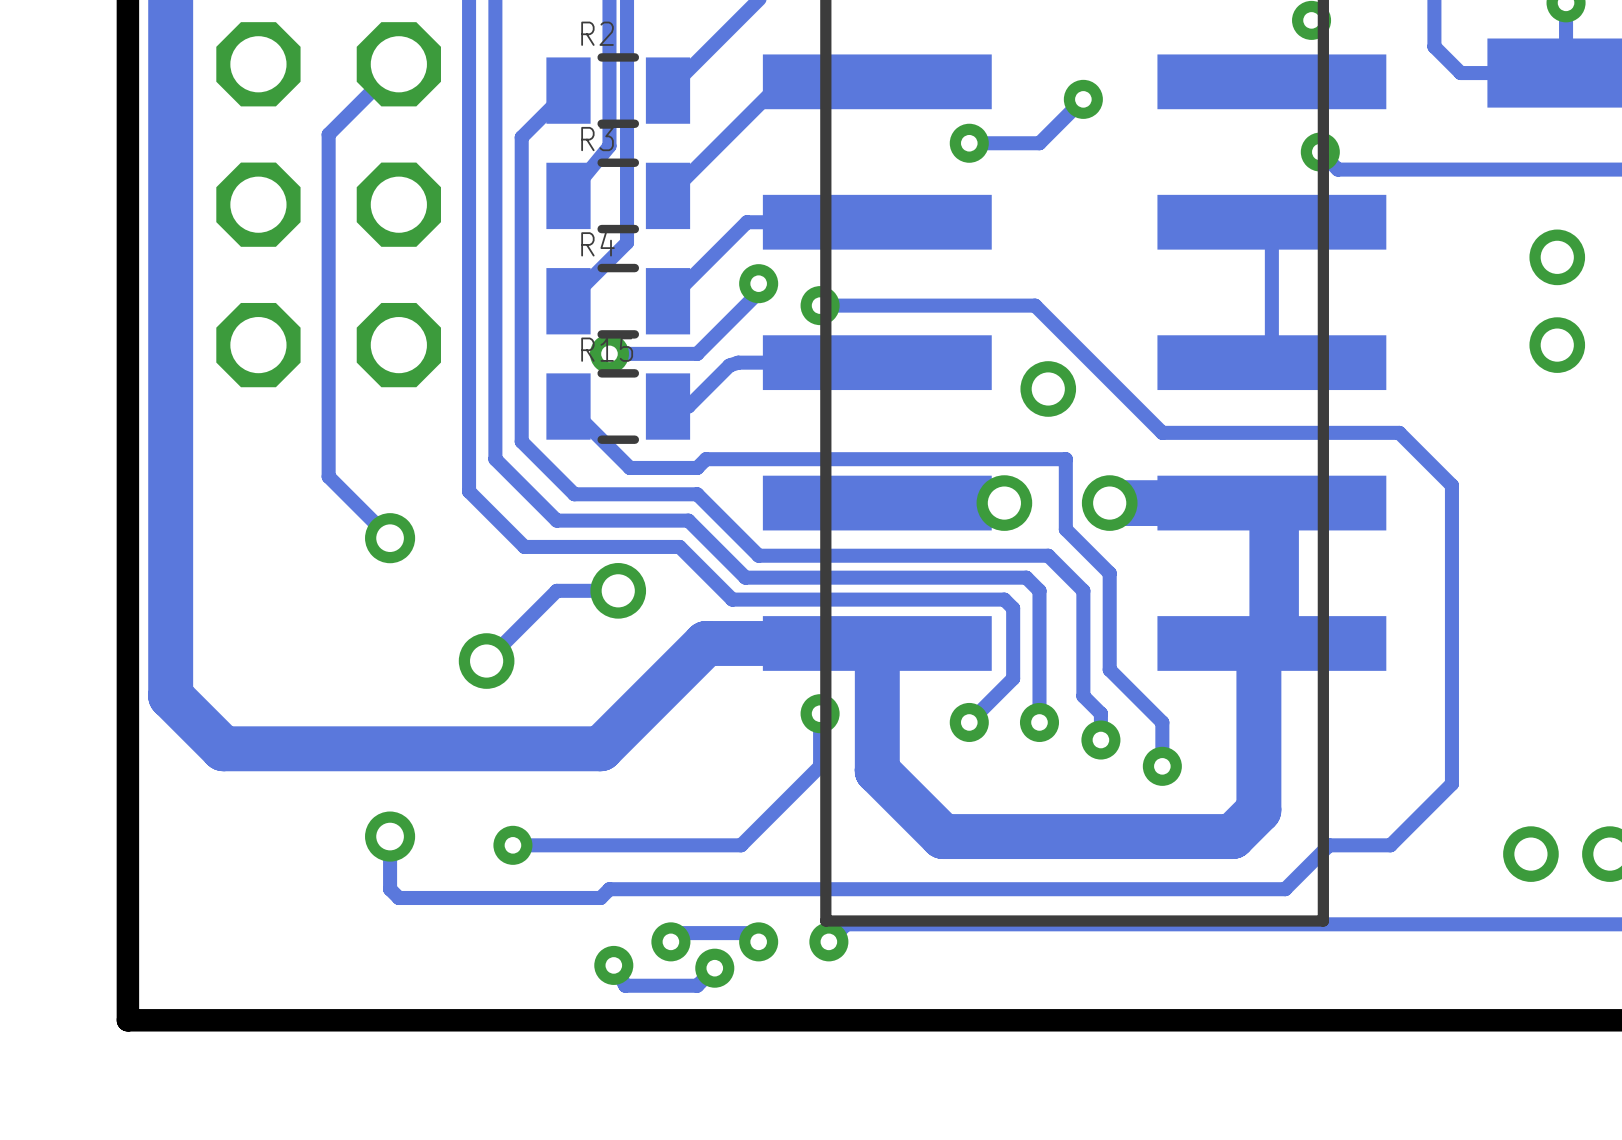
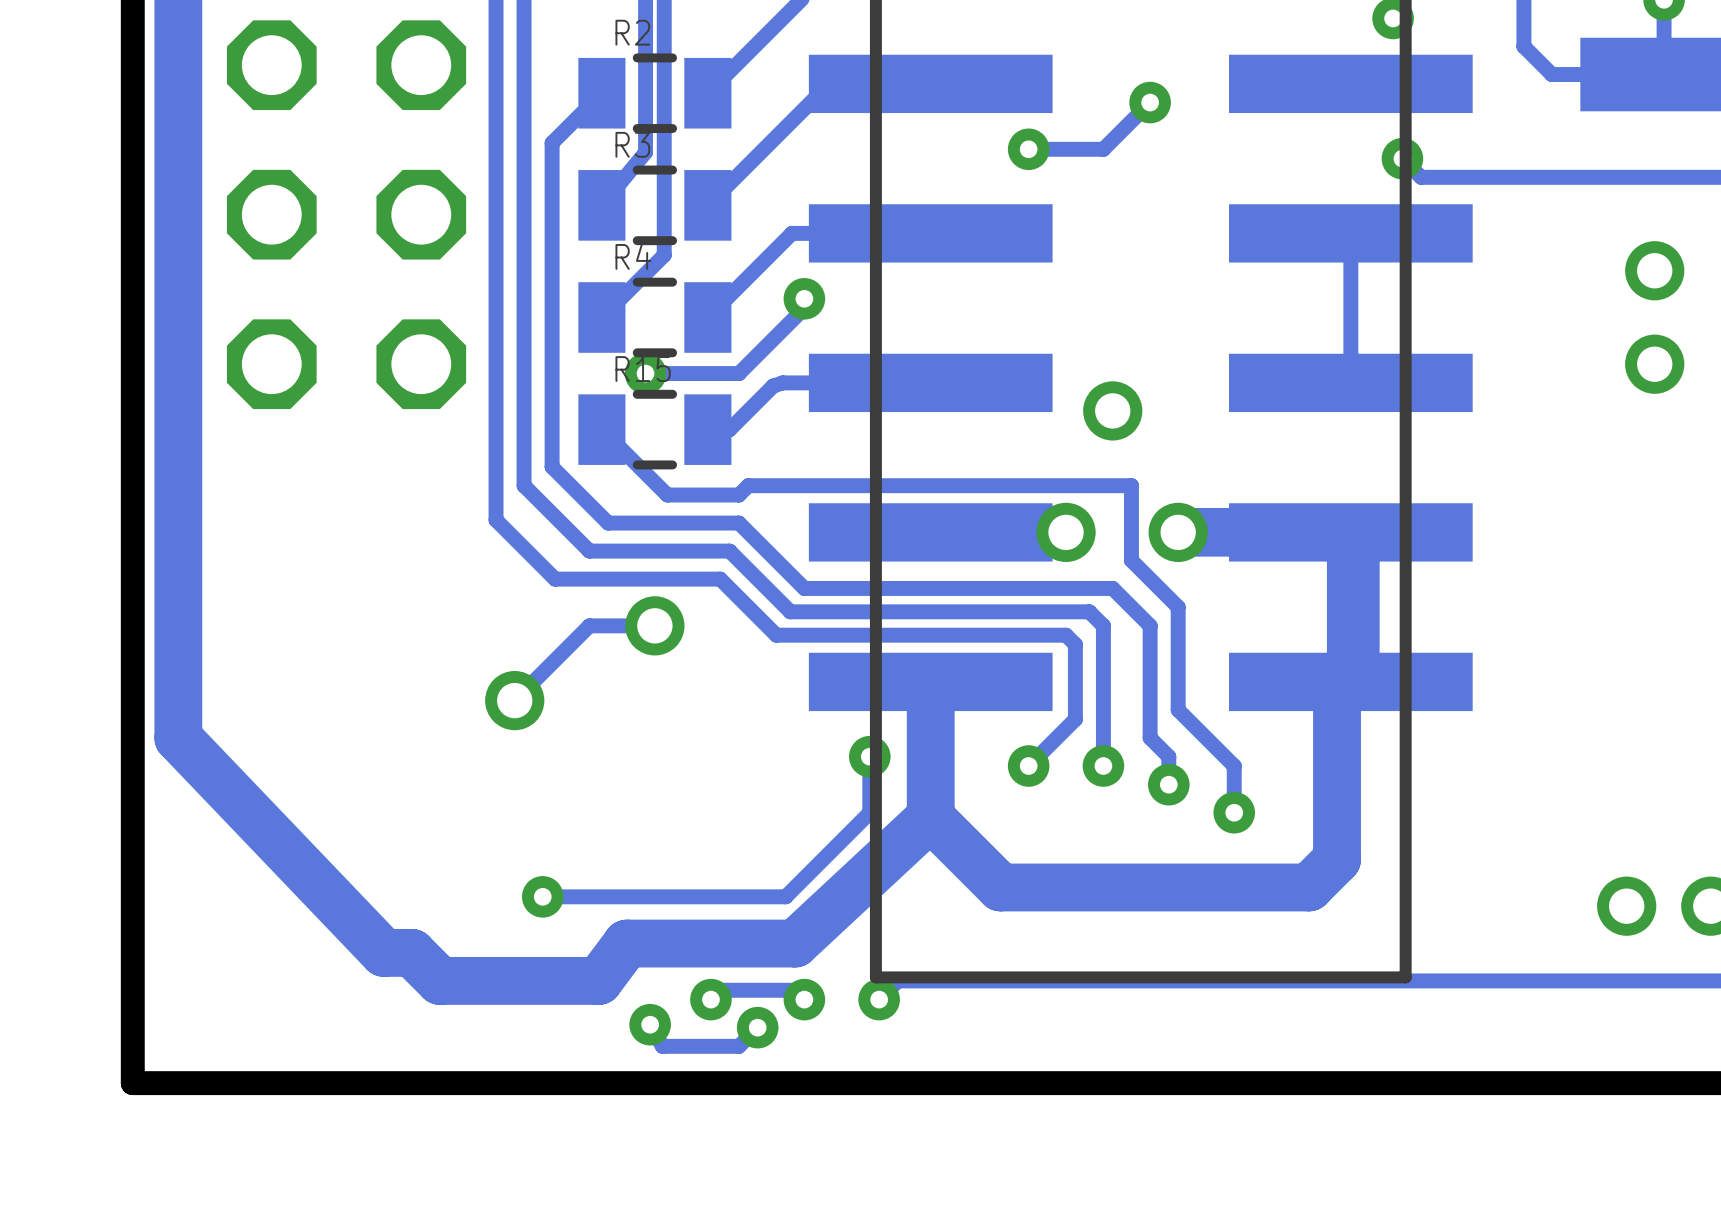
track: (398, 64) (328, 134) (328, 476) (390, 538) -> none
track: (820, 305) (1035, 305) (1162, 432) (1399, 432) (1451, 485) (1451, 783) (1390, 845) (1329, 845) (1285, 889) (749, 889) -> (930, 817) (795, 943)
via: (820, 305) -> none
via: (390, 538) -> none
track: (877, 643) (706, 643) (600, 748) (223, 748) (170, 696) -> none
track: (390, 836) (390, 889) (398, 897) (600, 897) (609, 889) -> (178, 737) (383, 952) (411, 952) (439, 980) (598, 980) (626, 943) (645, 943)
via: (390, 836) -> none
track width: thin (749, 889) (609, 889) -> thick (795, 943) (645, 943)

